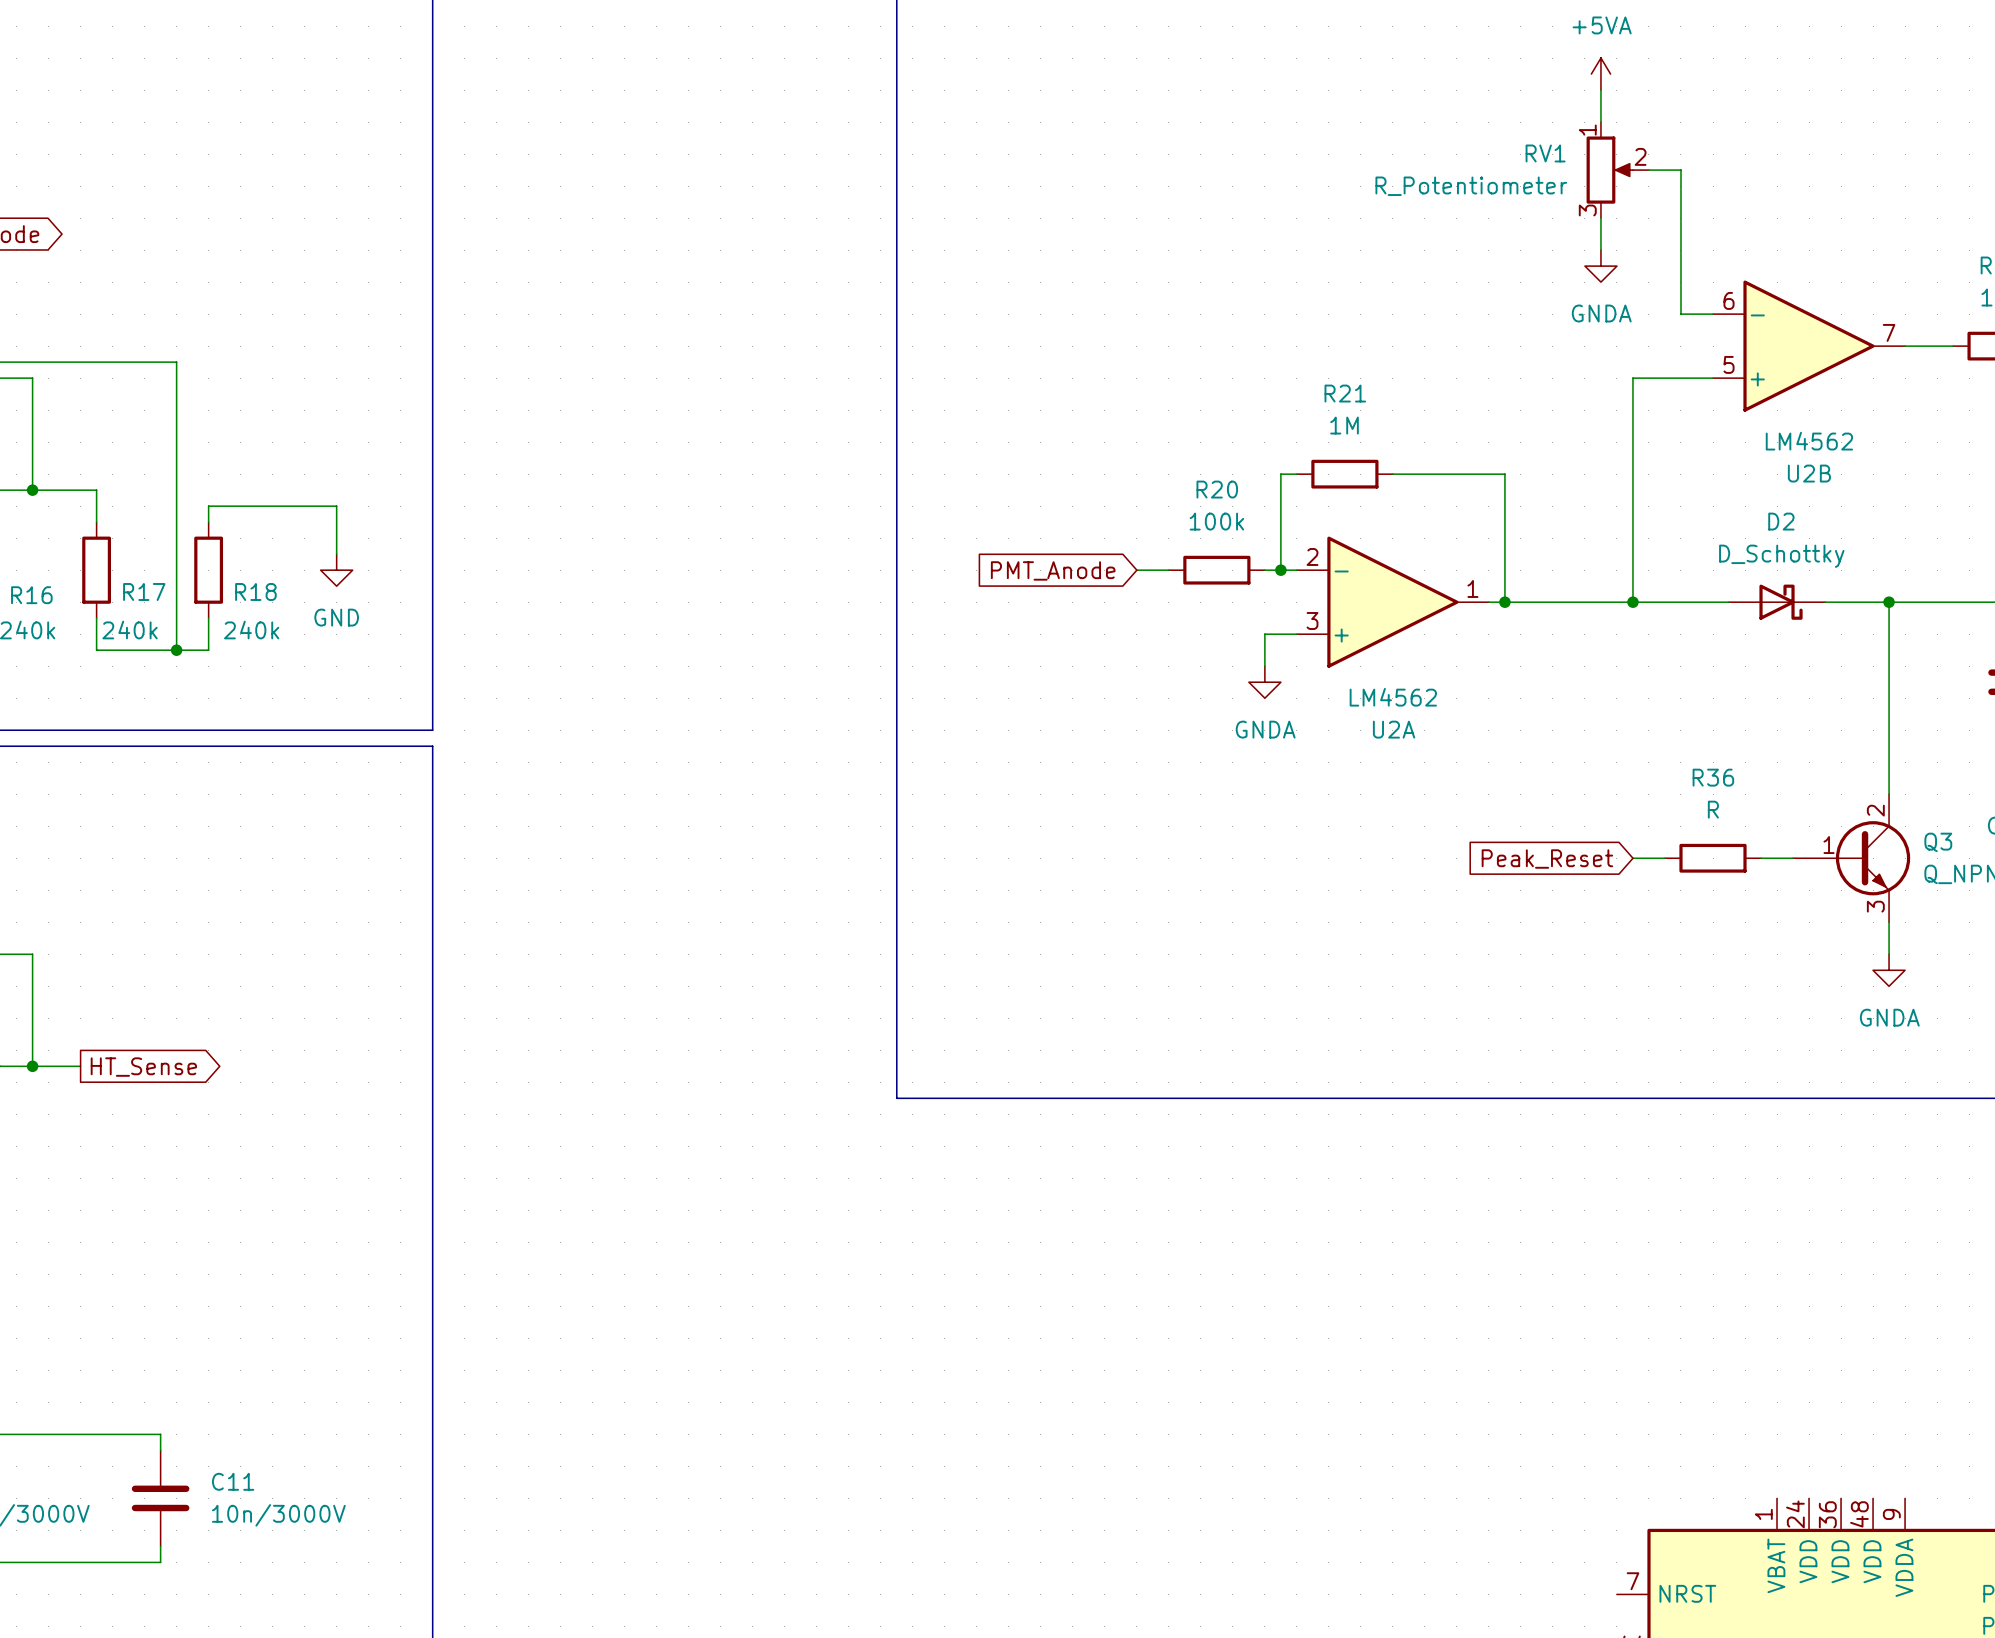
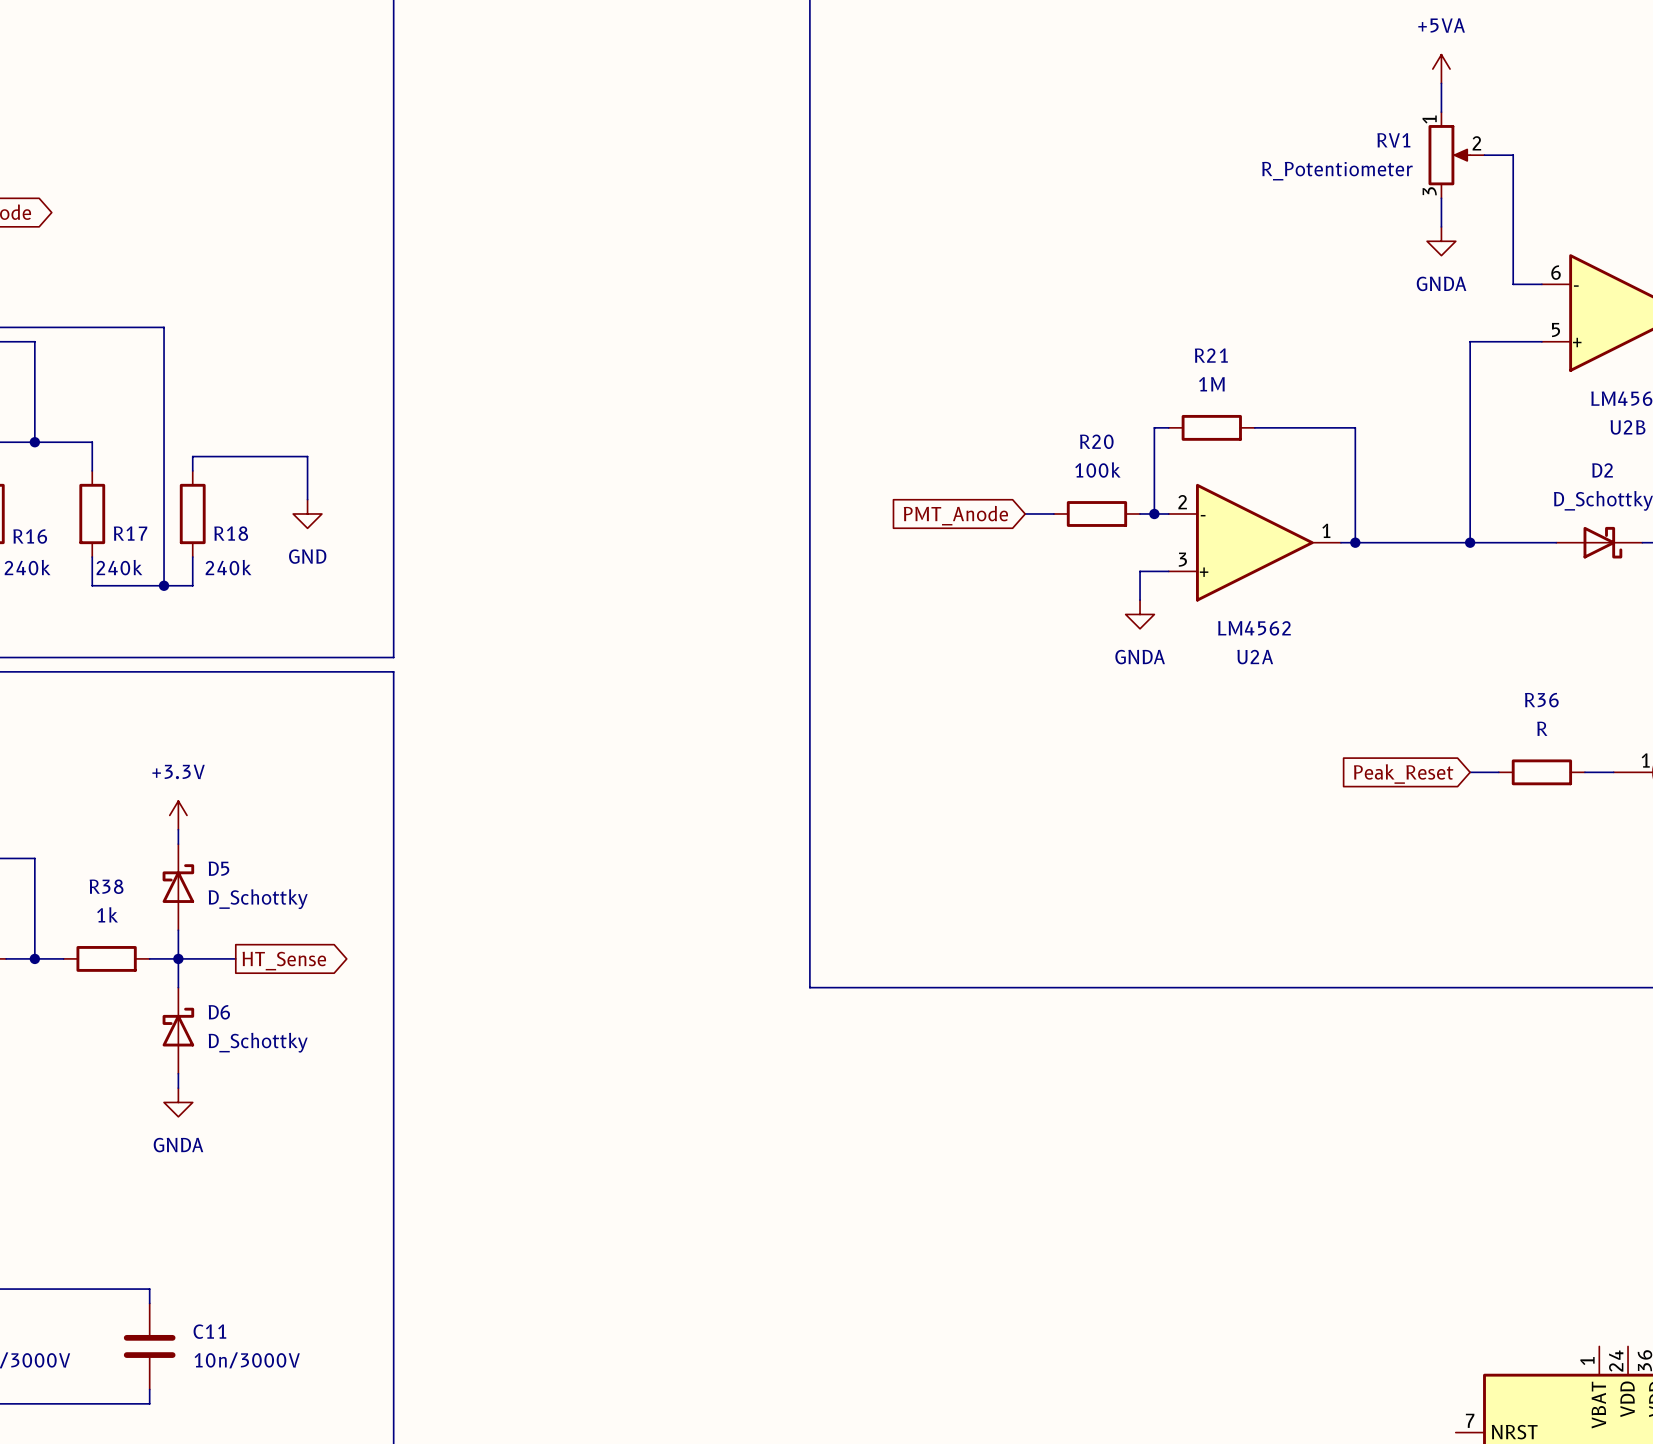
power symbol: none -> +3.3V (178, 815)
wire: none -> (178, 829) (178, 844)
D5: none -> D_Schottky (178, 887)
wire: none -> (178, 930) (178, 987)
R38: none -> 1k (106, 958)
wire: none -> (149, 958) (235, 958)
junction: none -> (178, 958)
global label position: HT_Sense (143, 1067) -> HT_Sense (284, 961)
D6: none -> D_Schottky (178, 1030)
wire: none -> (178, 1073) (178, 1088)
power symbol: none -> GNDA (178, 1102)

